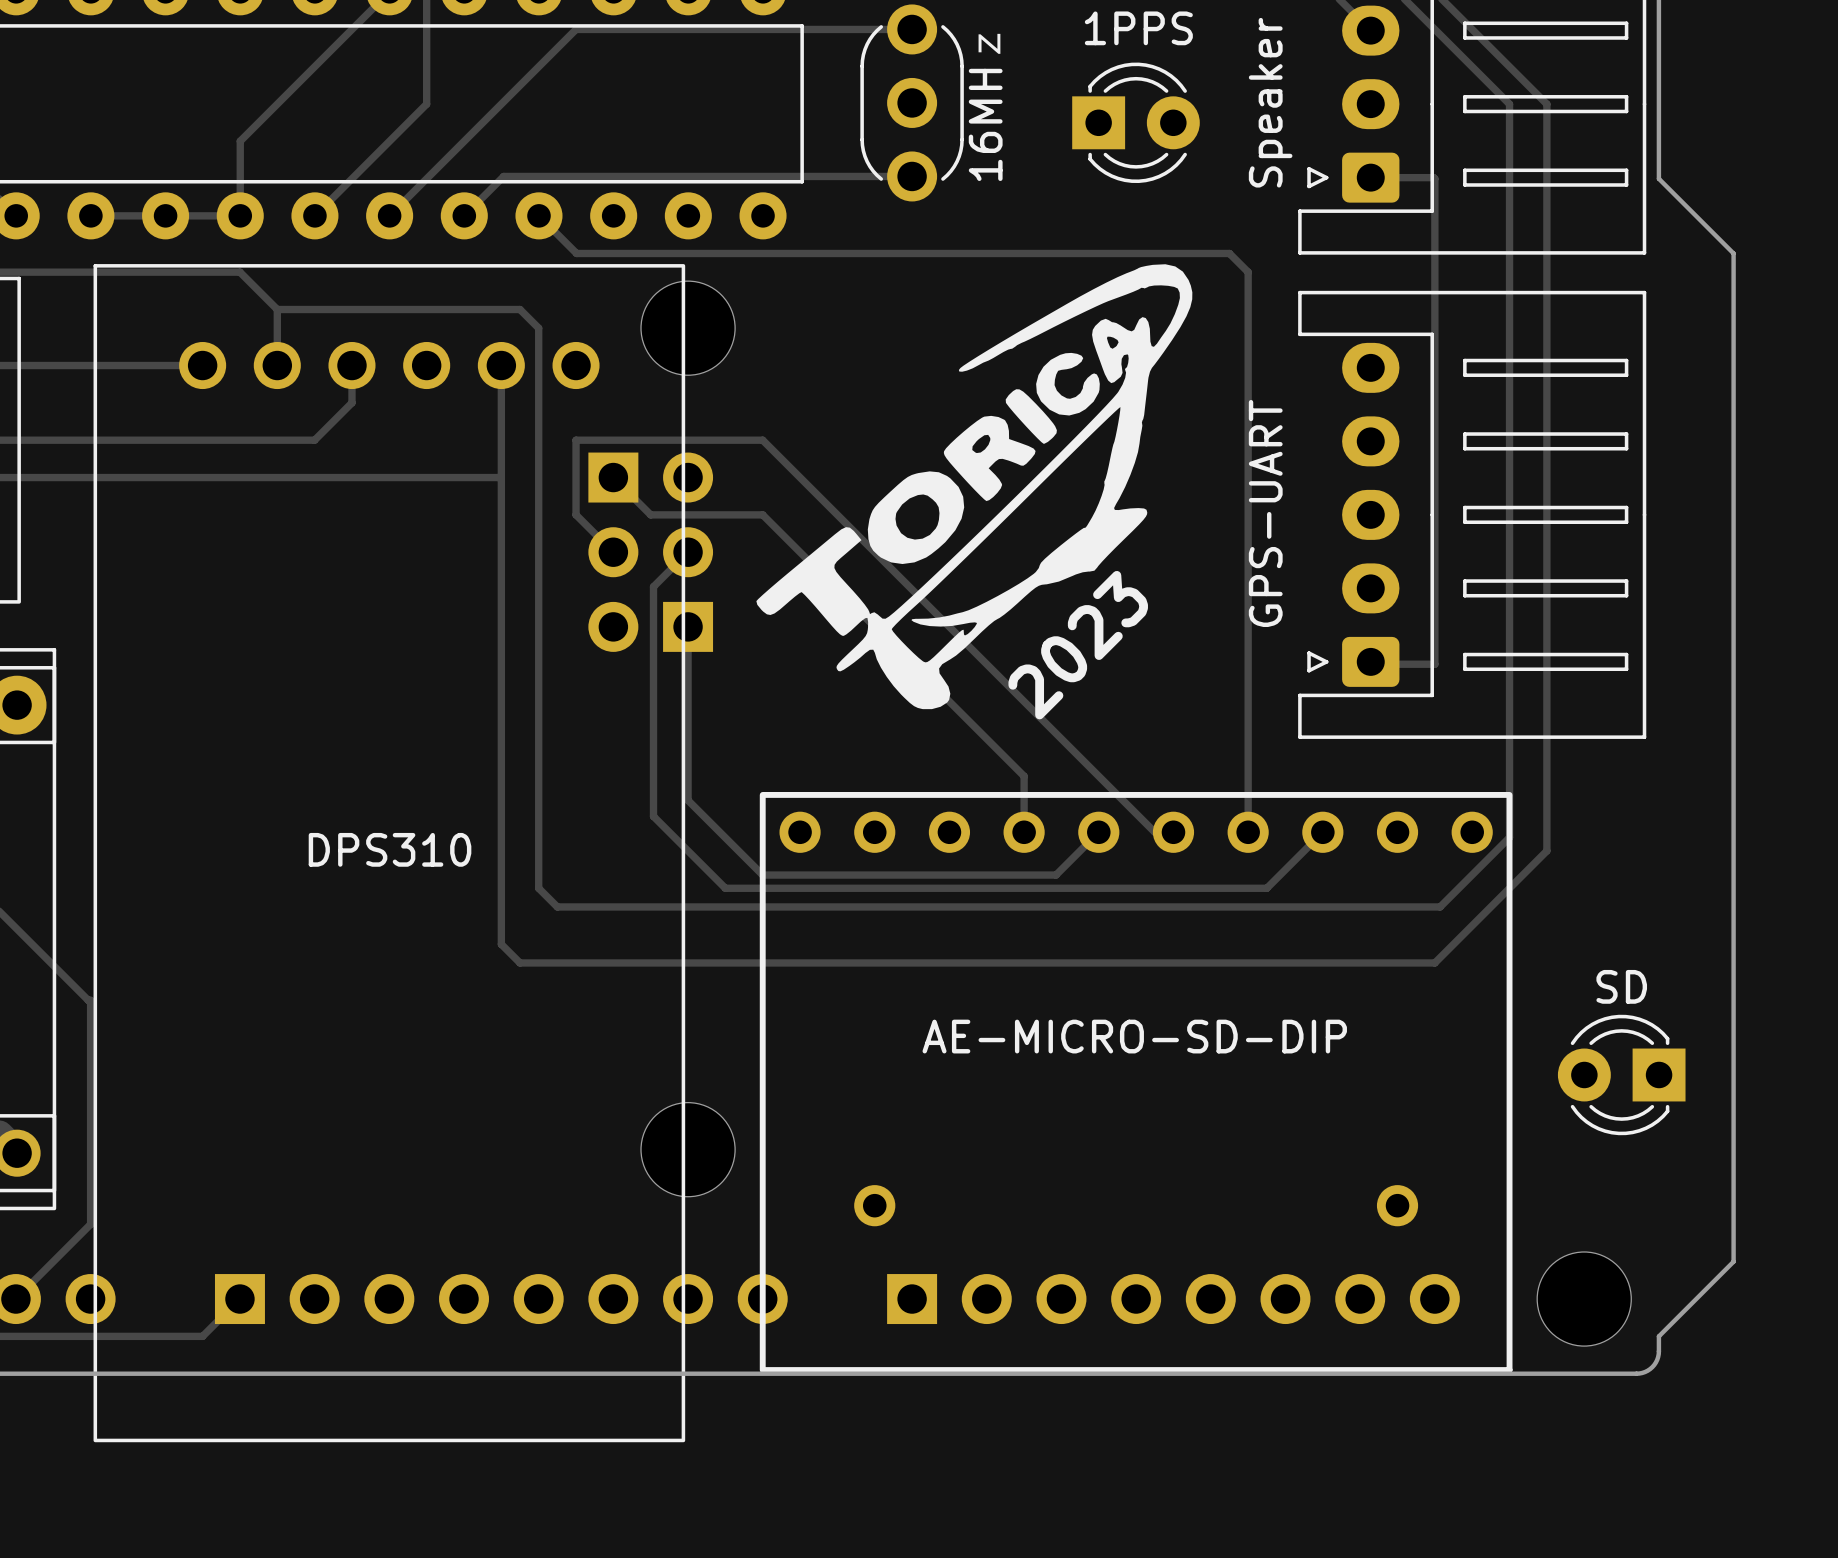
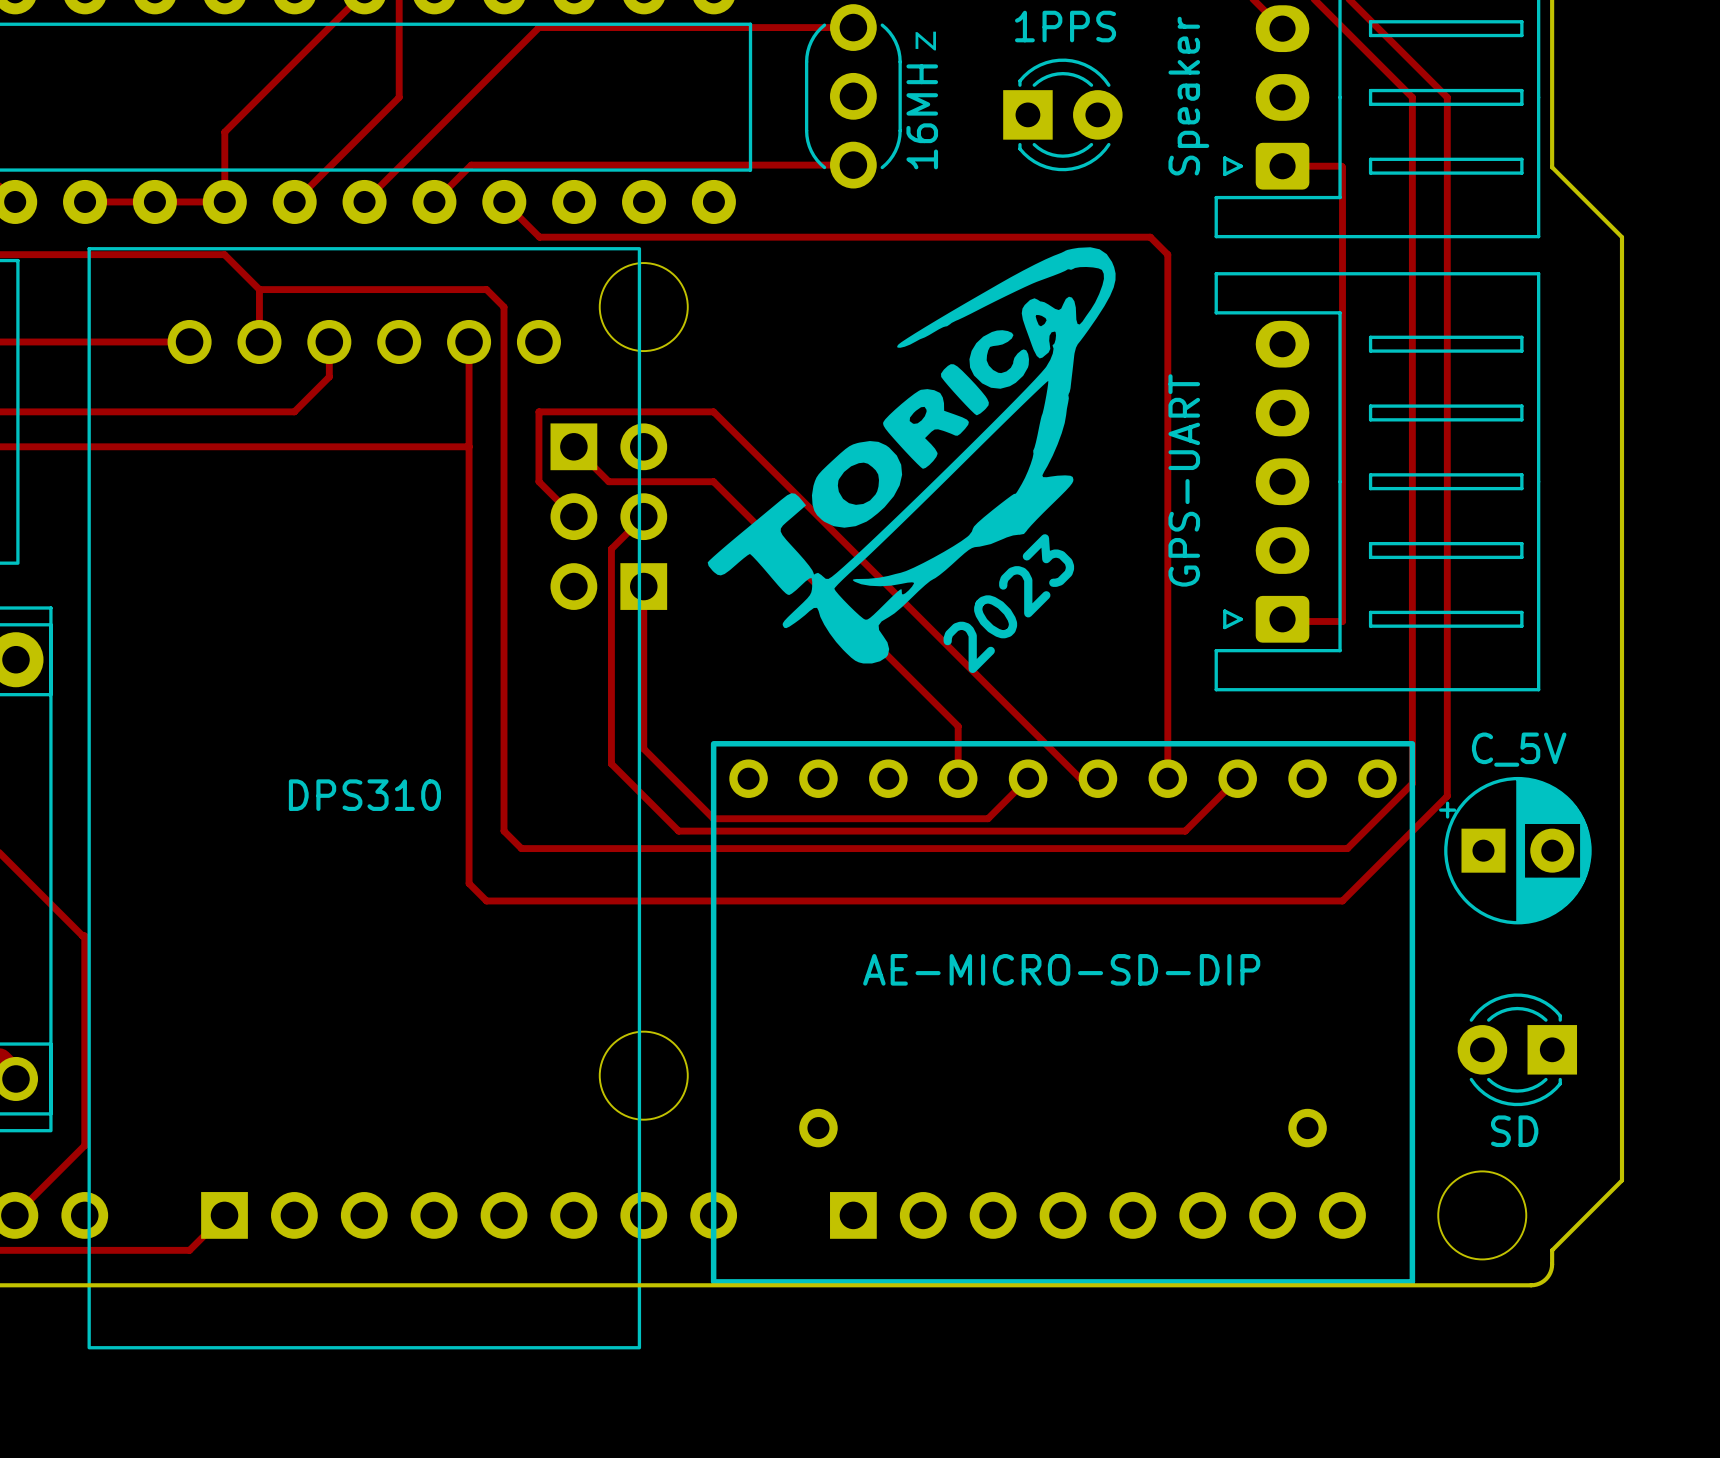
part: none -> C_5V (1515, 850)
part value position: SD (1621, 986) -> SD (1514, 1131)
part position: (1621, 1074) -> (1517, 1049)

